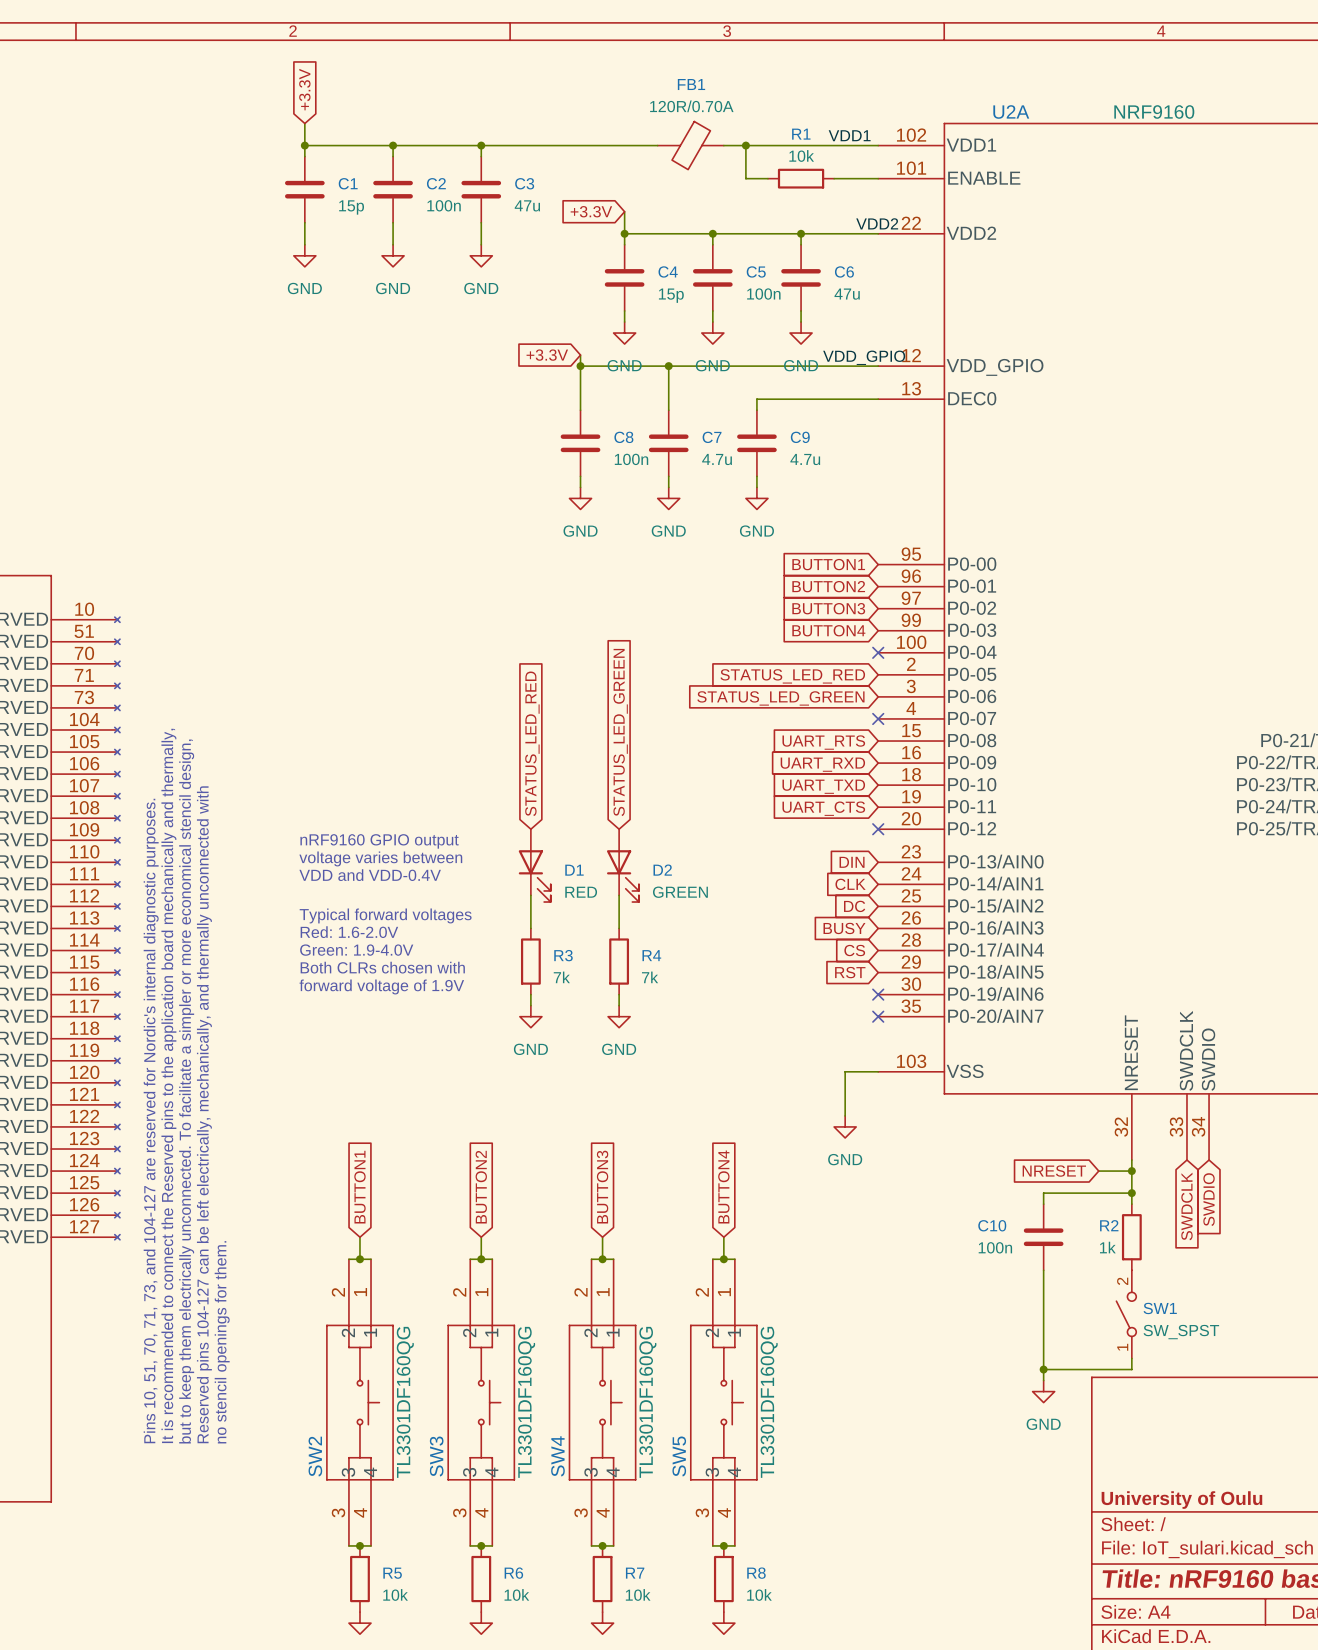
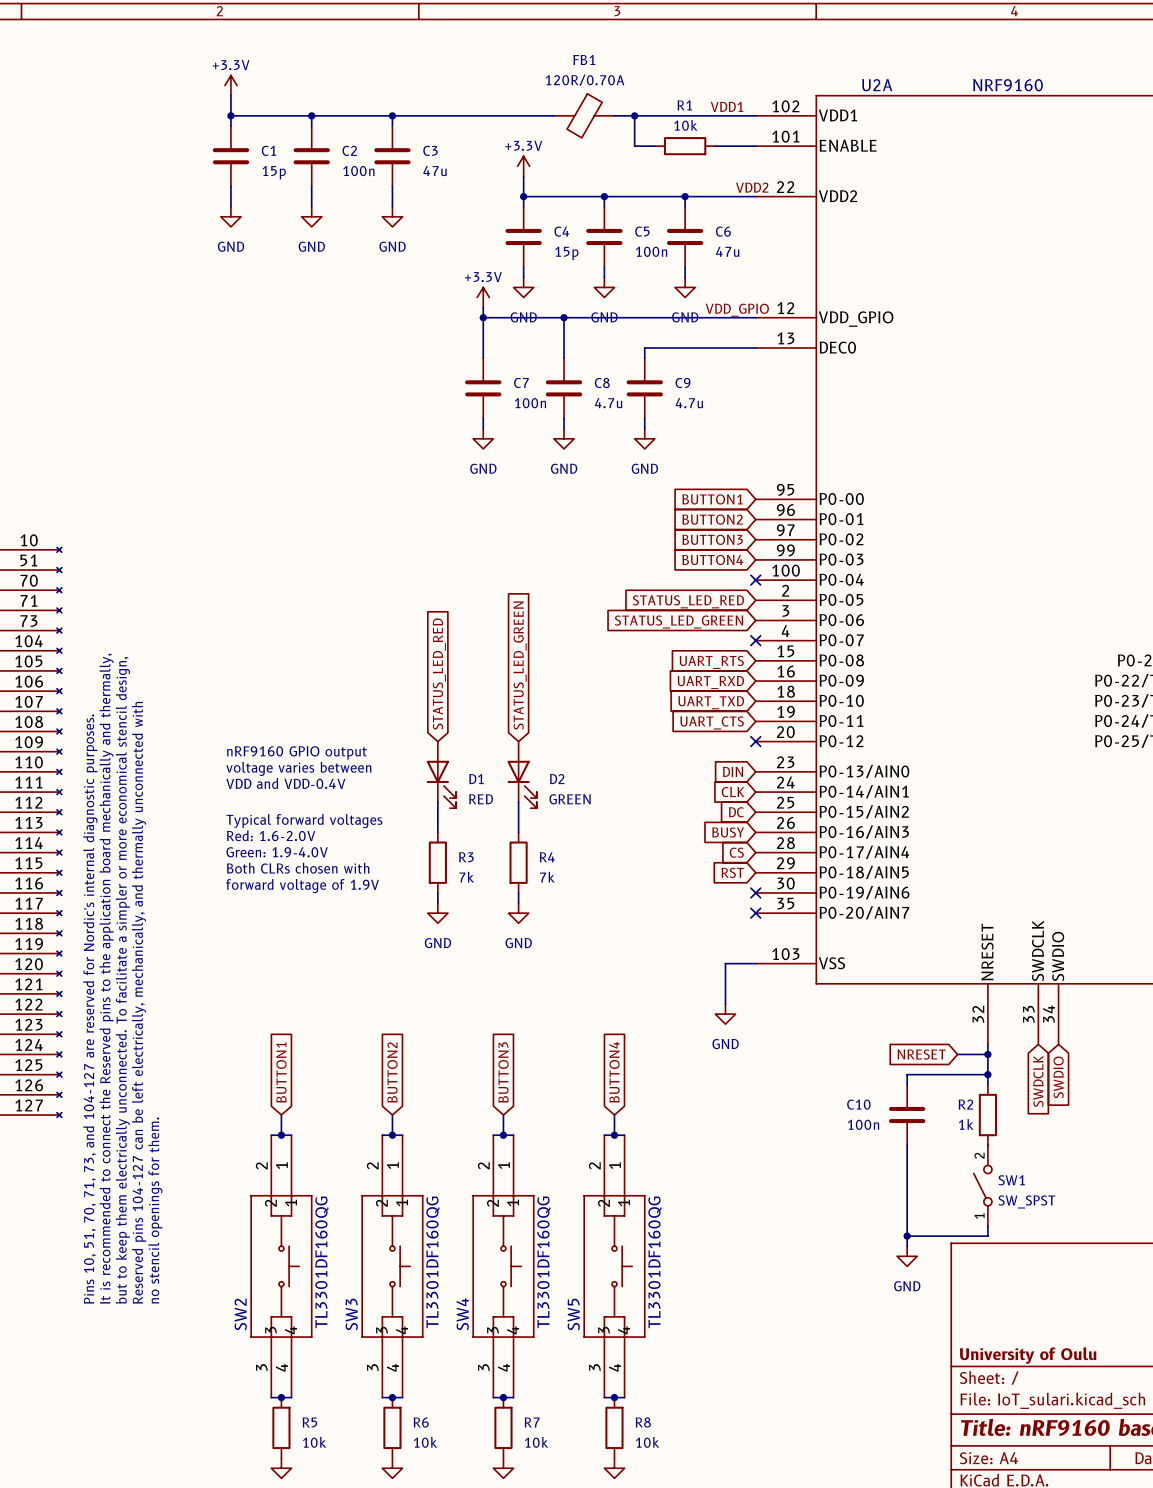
global label: +3.3V (304, 89) -> none
power symbol: none -> +3.3V (230, 85)
power symbol: none -> +3.3V (523, 166)
global label: +3.3V (591, 211) -> none
power symbol: none -> +3.3V (483, 297)
global label: +3.3V (547, 355) -> none
C8 name: C8 (623, 437) -> C7 (521, 383)
C7 name: C7 (712, 437) -> C8 (602, 383)

